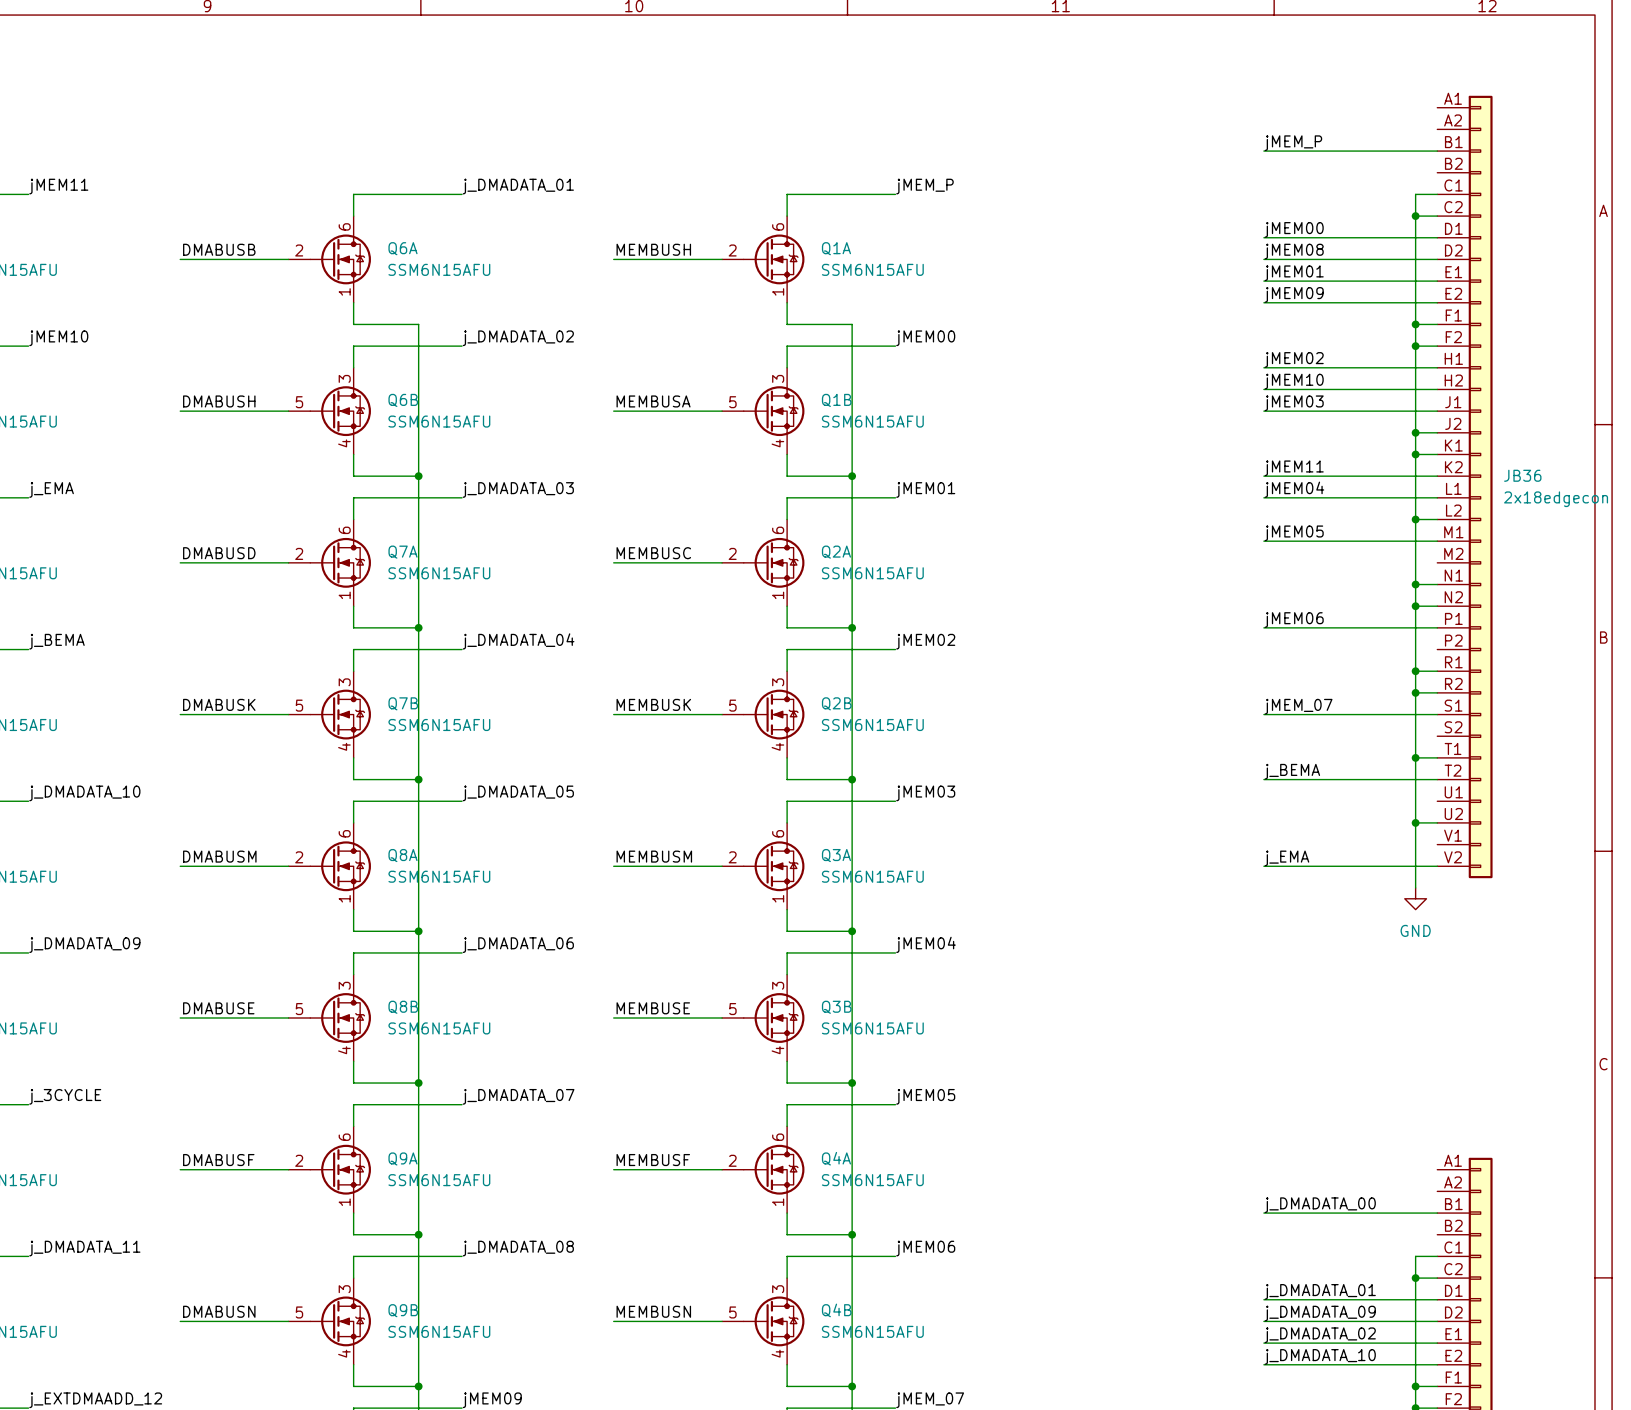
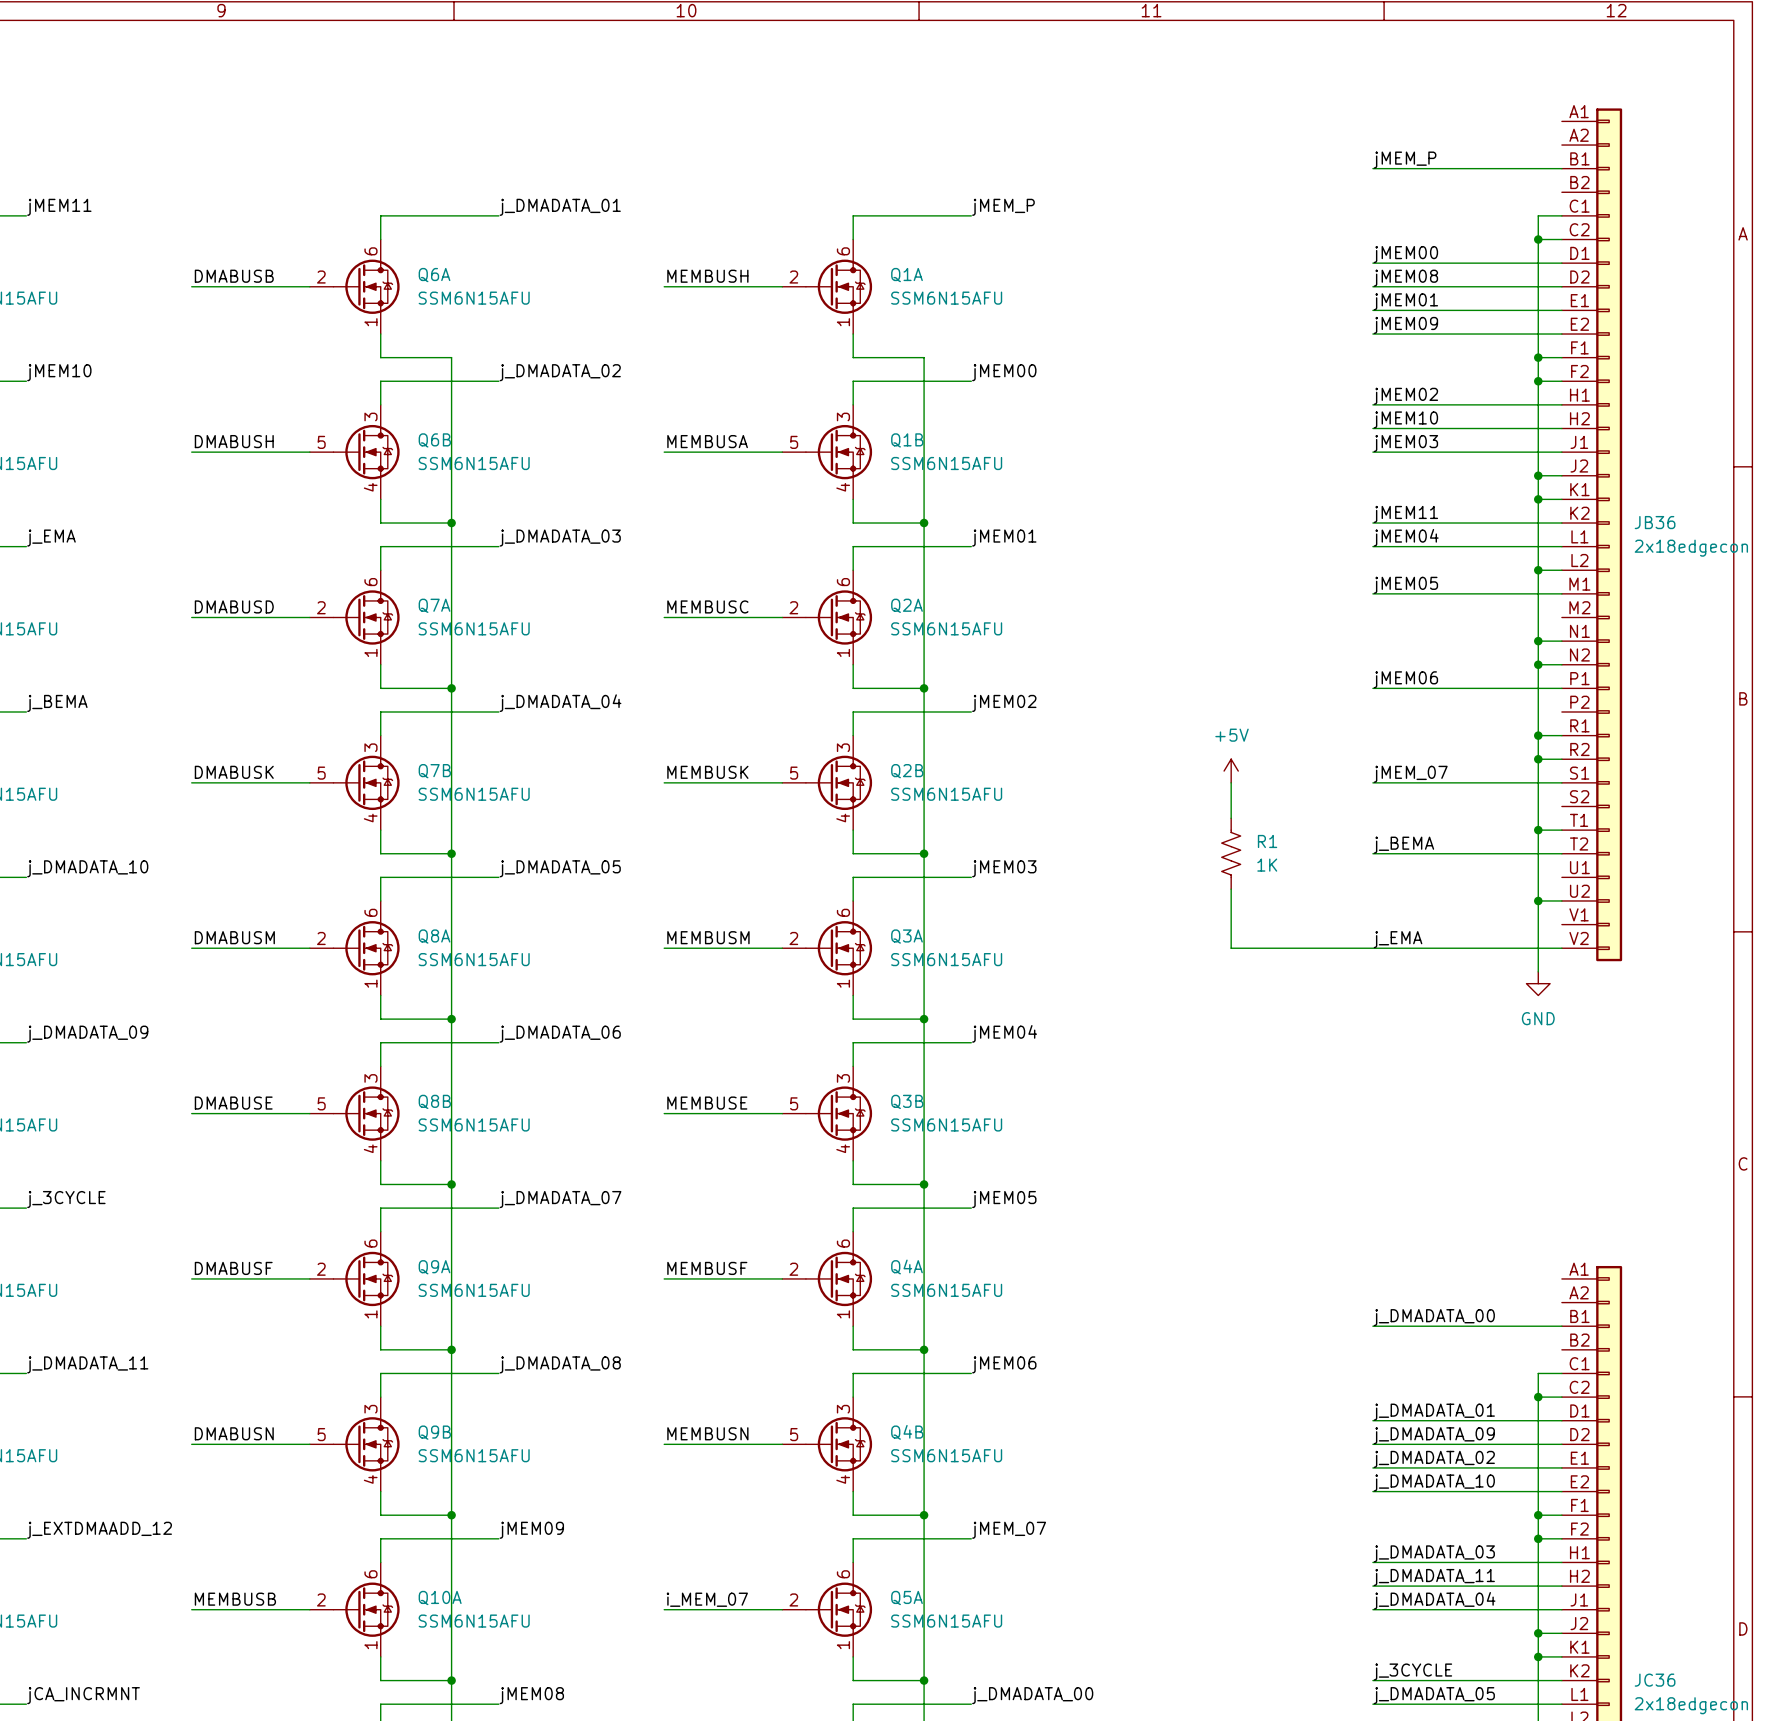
power symbol: none -> +5V (1231, 771)
wire: none -> (1231, 782) (1231, 818)
R1: none -> 1K (1231, 853)
wire: none -> (1231, 889) (1231, 948) (1372, 948)

